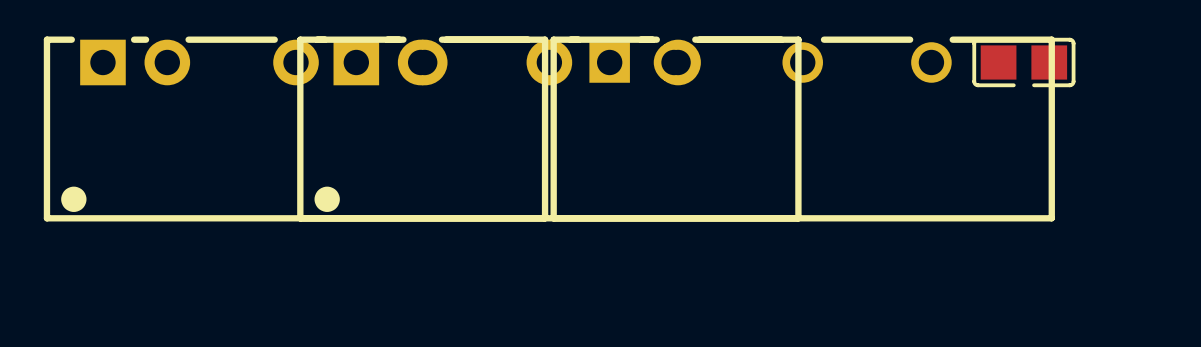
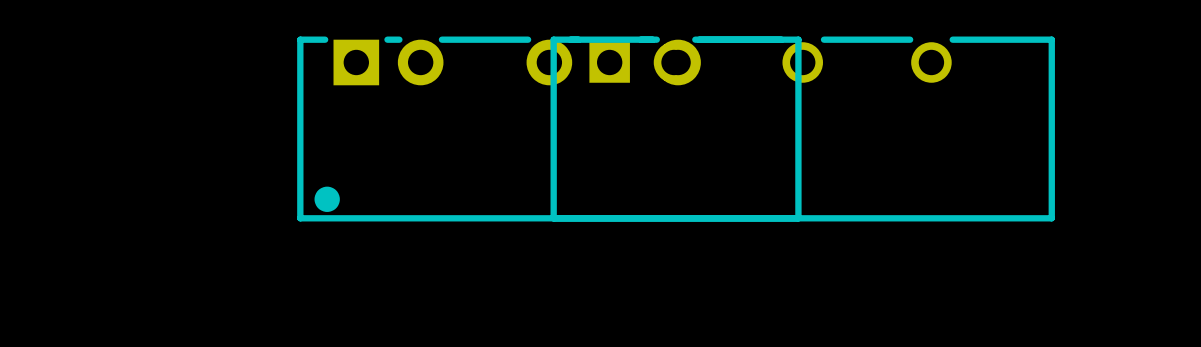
part: (1023, 62) -> none
part: (296, 128) -> none

